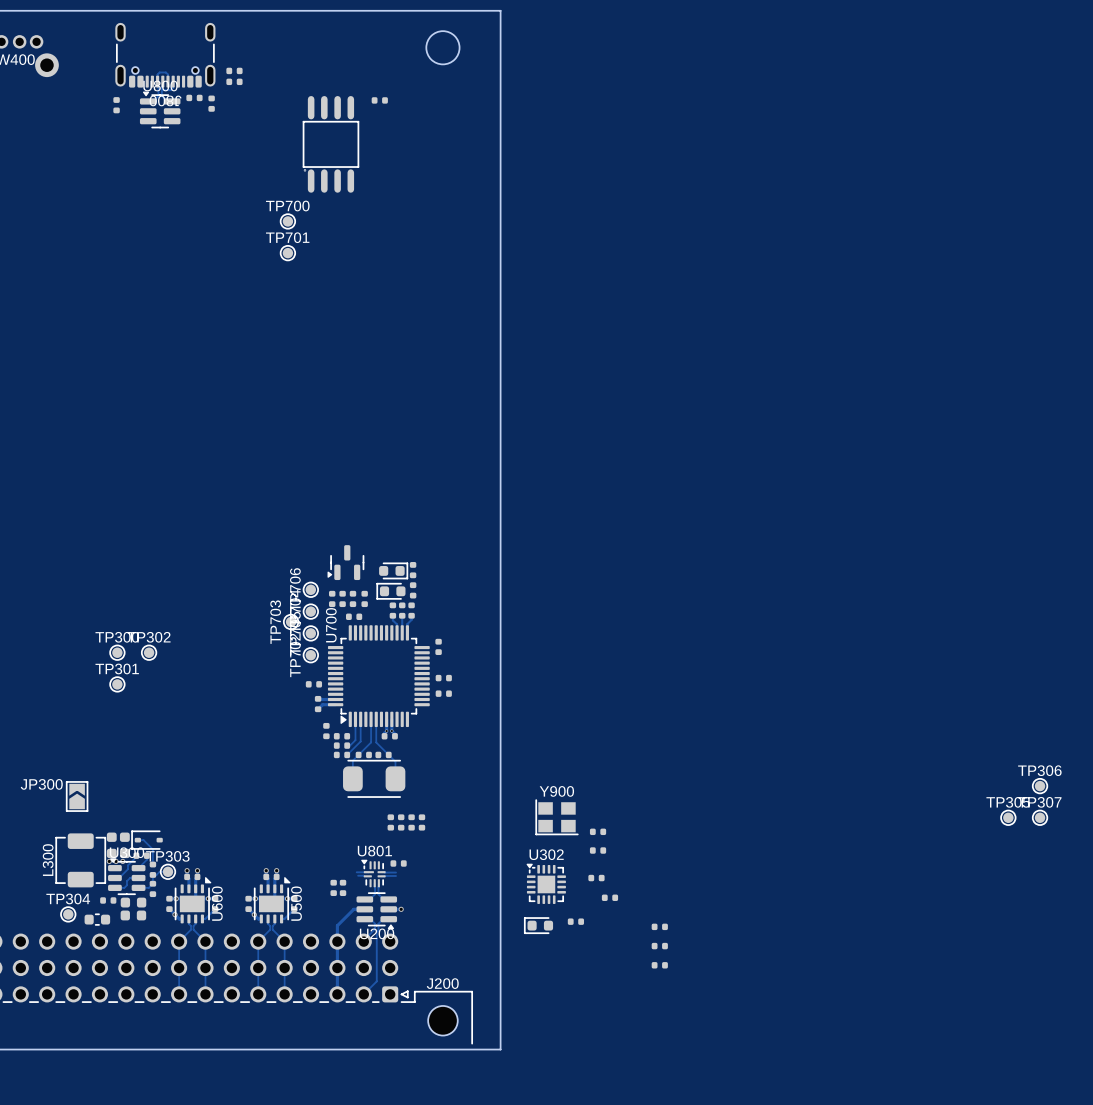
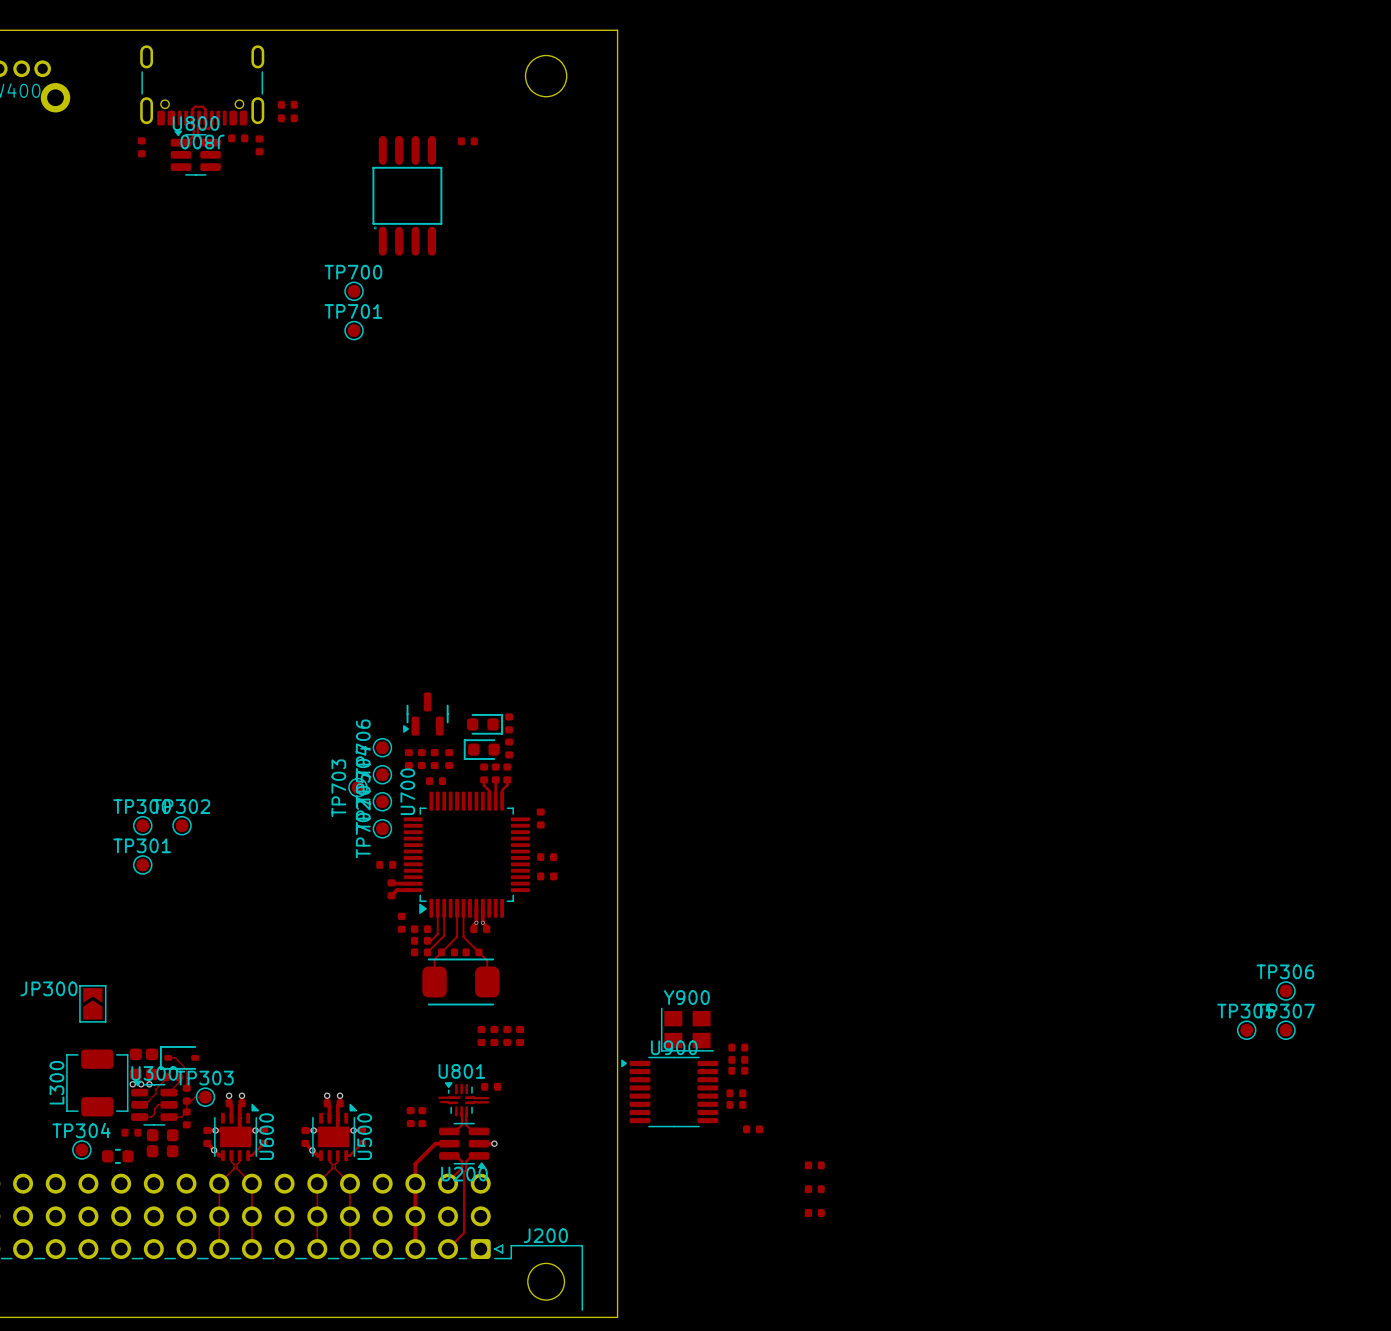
part: none -> (738, 1059)
U900: none -> (669, 1092)
part: none -> (736, 1093)
U302: (546, 883) -> none
part: (575, 921) -> none
part: (538, 925) -> none

